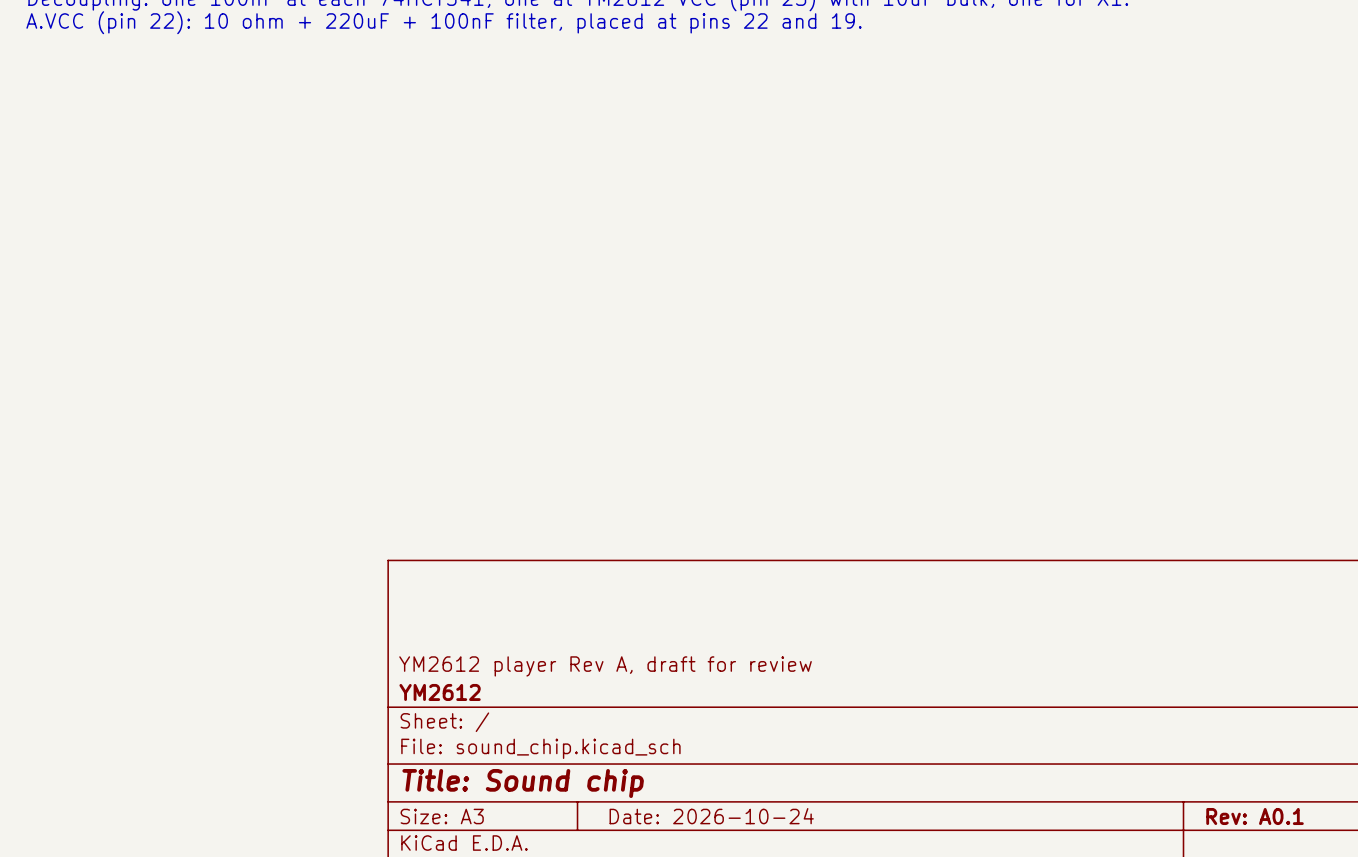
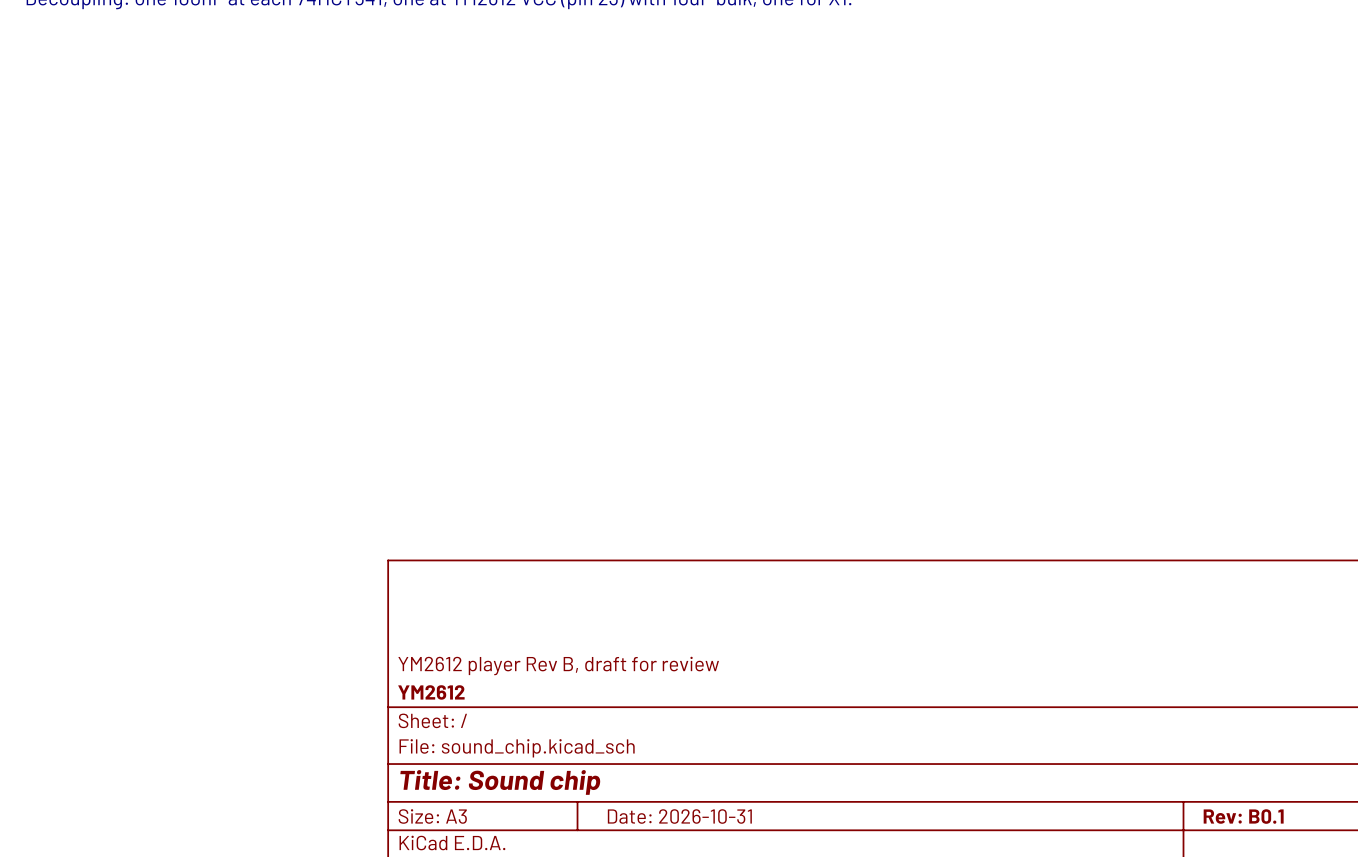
text: A.VCC (pin 22): 10 ohm + 220uF + 100nF filter, placed at pins 22 and 19. (444, 22) -> none
title block: YM2612 player Rev A, draft for review (605, 666) -> YM2612 player Rev B, draft for review (558, 665)
title block: Date: 2026-10-24 (711, 816) -> Date: 2026-10-31 (679, 816)
title block: Rev: A0.1 (1255, 816) -> Rev: B0.1 (1243, 816)

